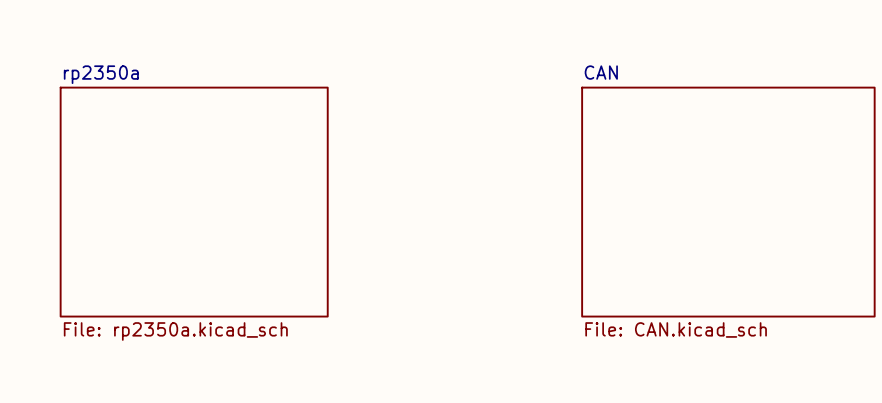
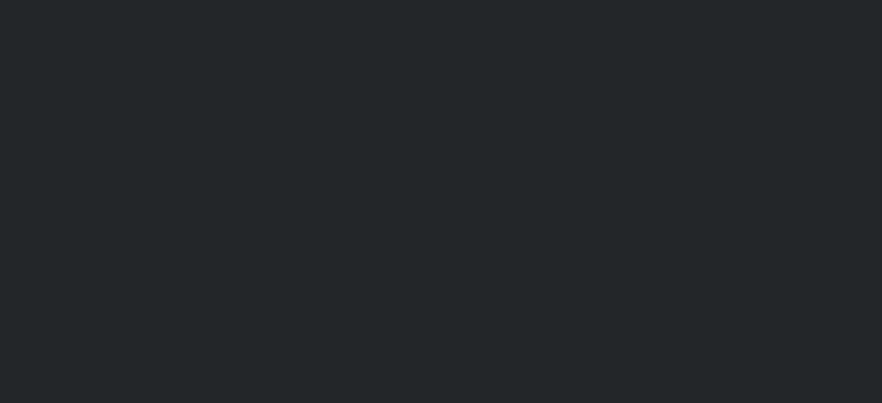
sheet rp2350a: File: rp2350a.kicad_sch (194, 202) -> none
sheet CAN: File: CAN.kicad_sch (728, 202) -> none

